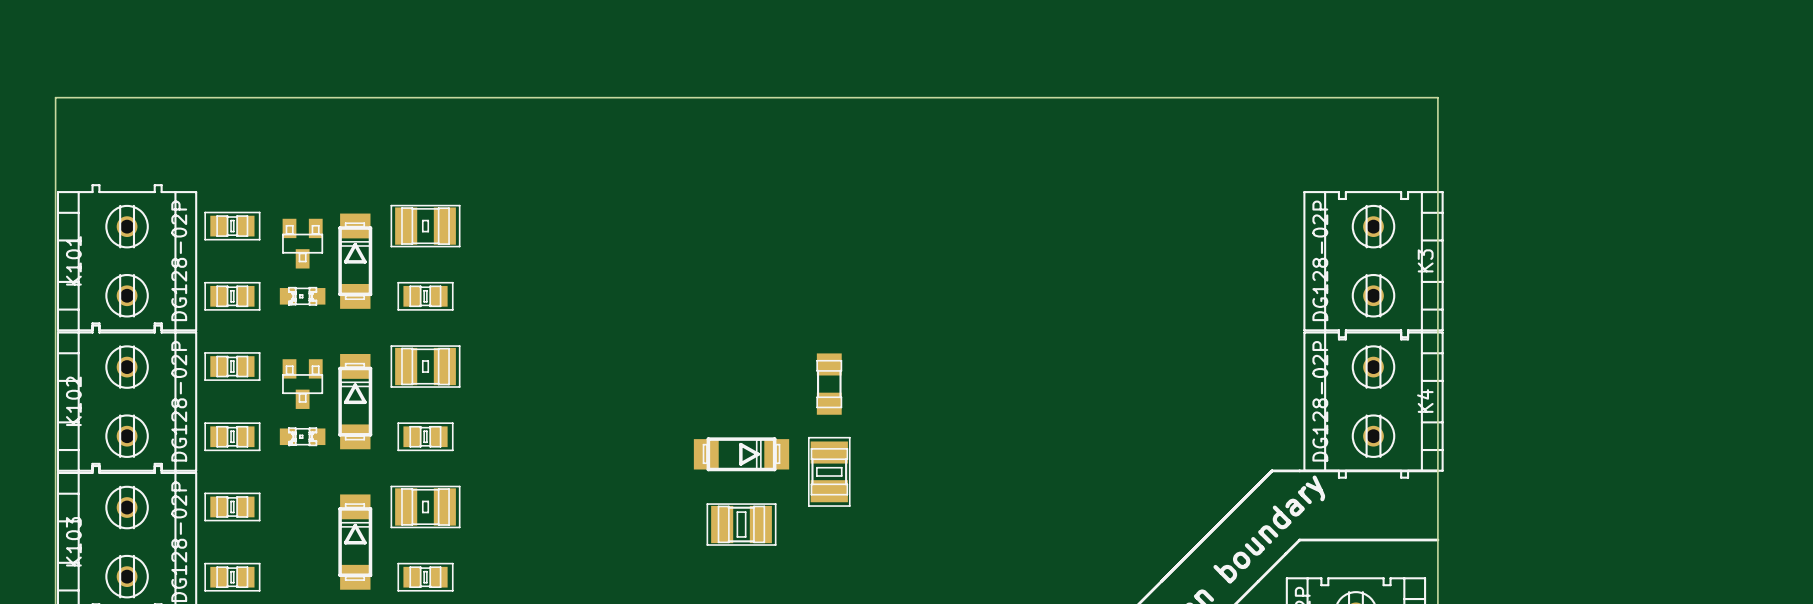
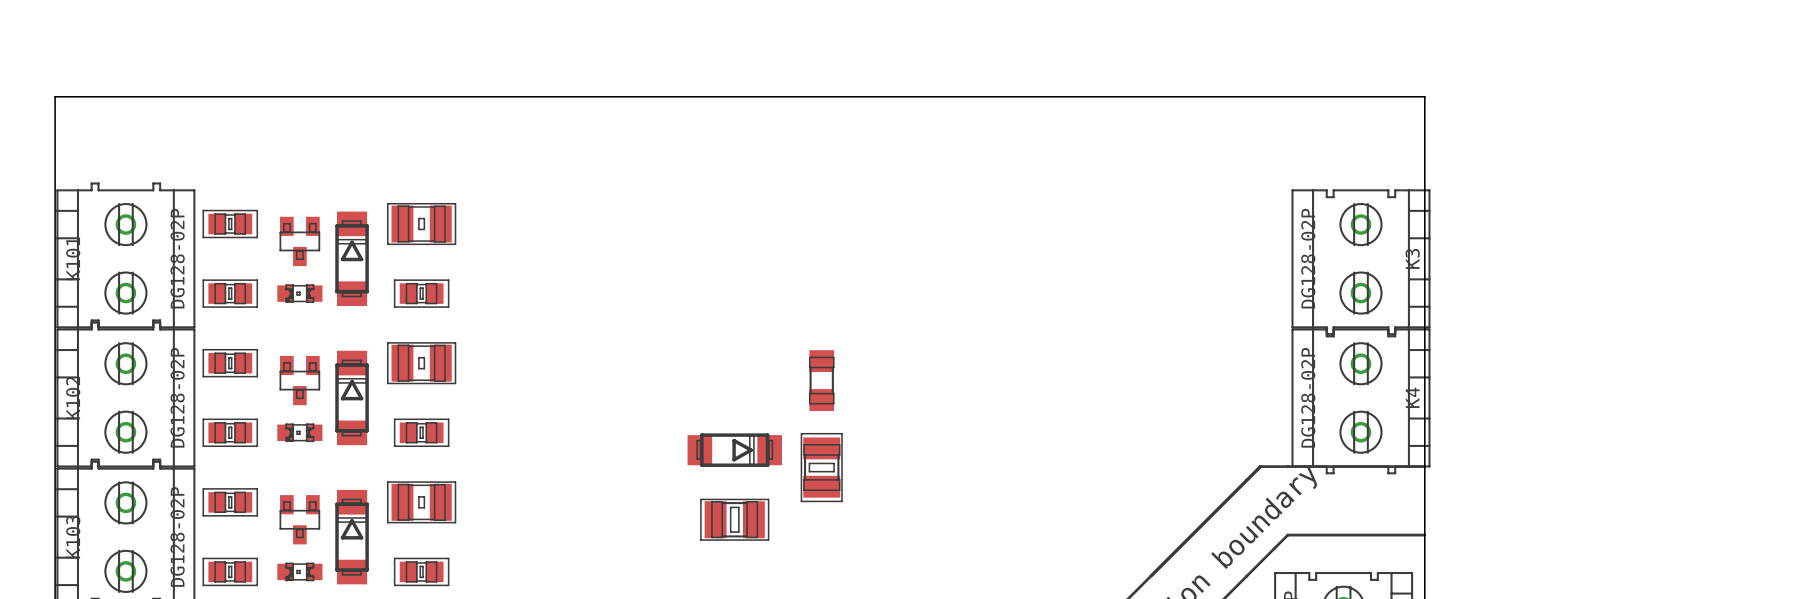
part: none -> (299, 519)
part: none -> (299, 571)

